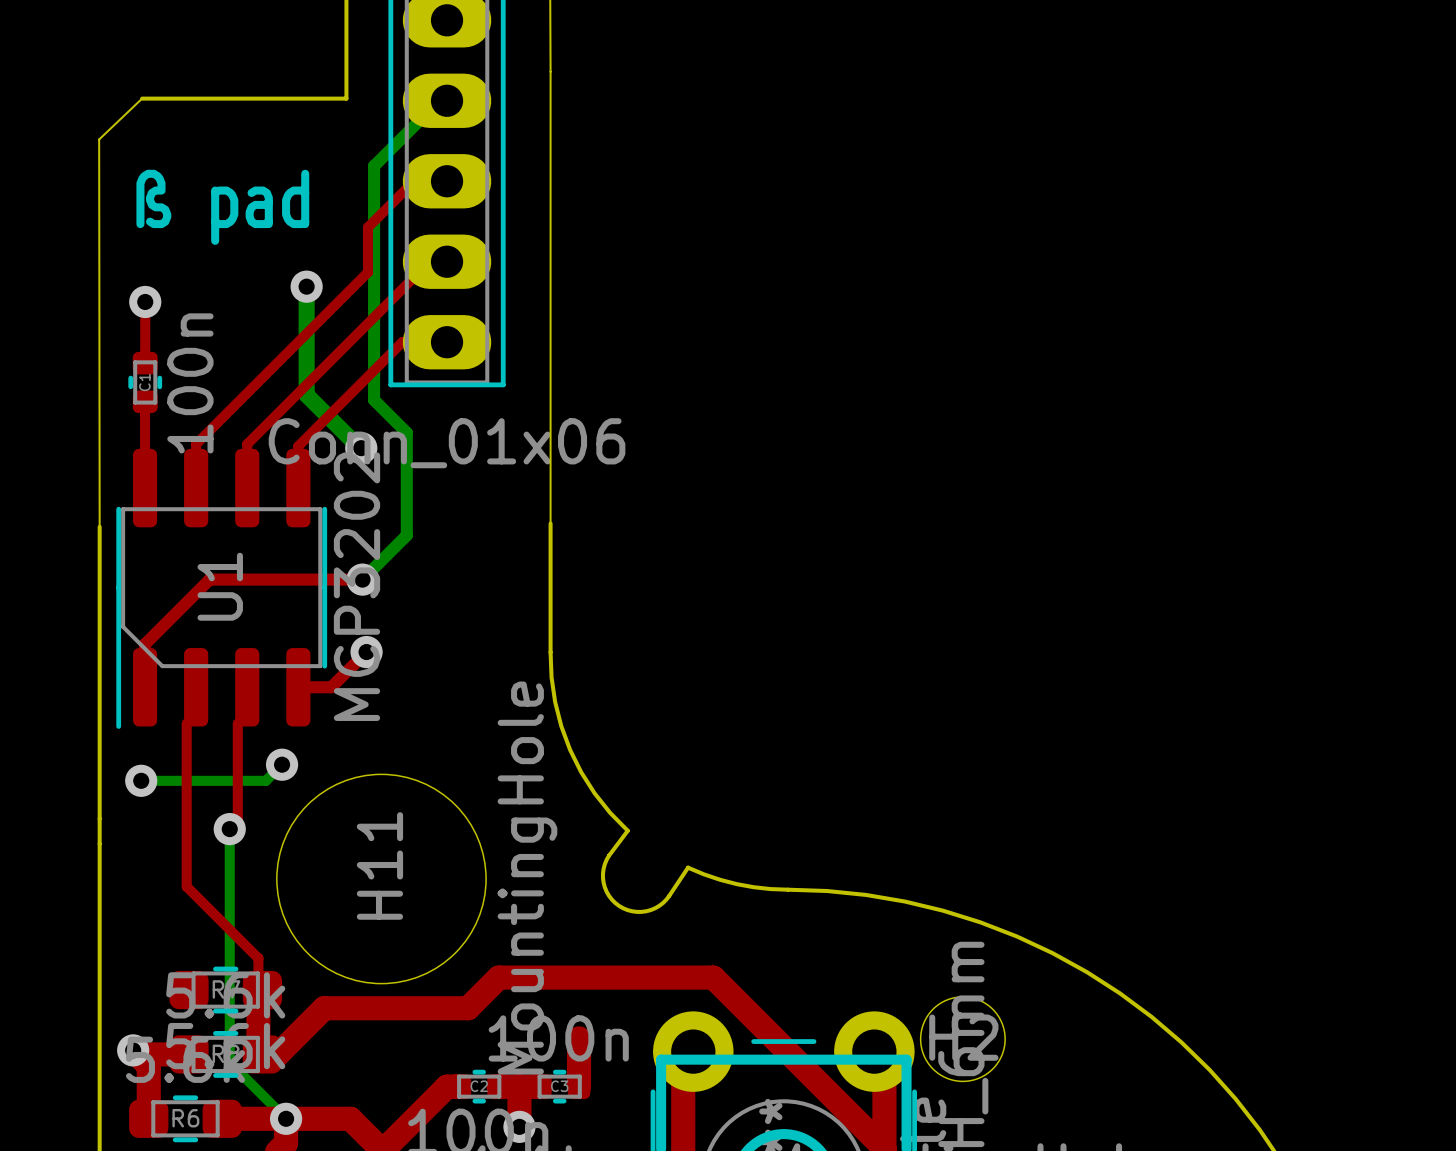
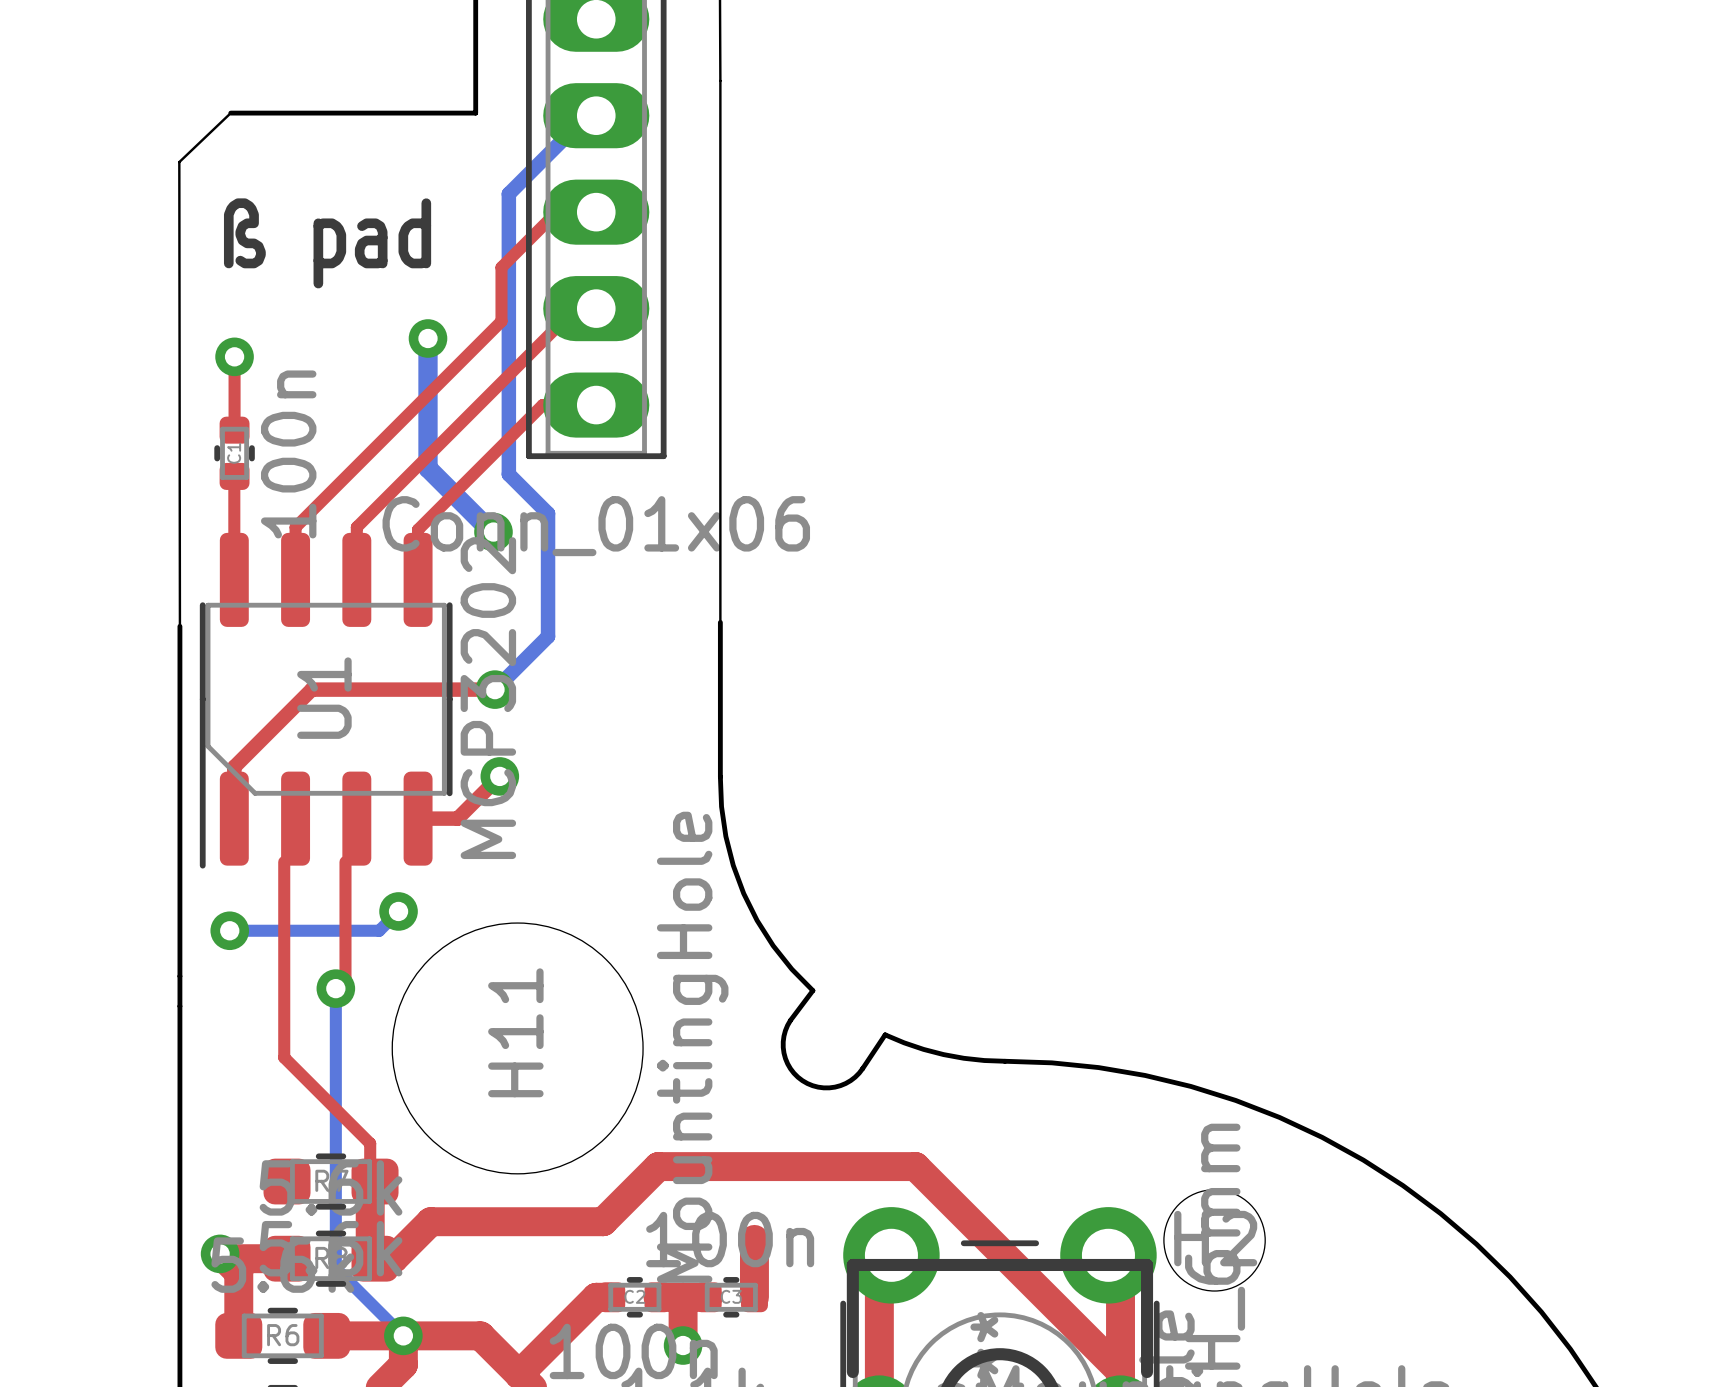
top track: (468, 1008) (324, 1008) (308, 1023) -> (621, 1203) (603, 1221) (430, 1221)

